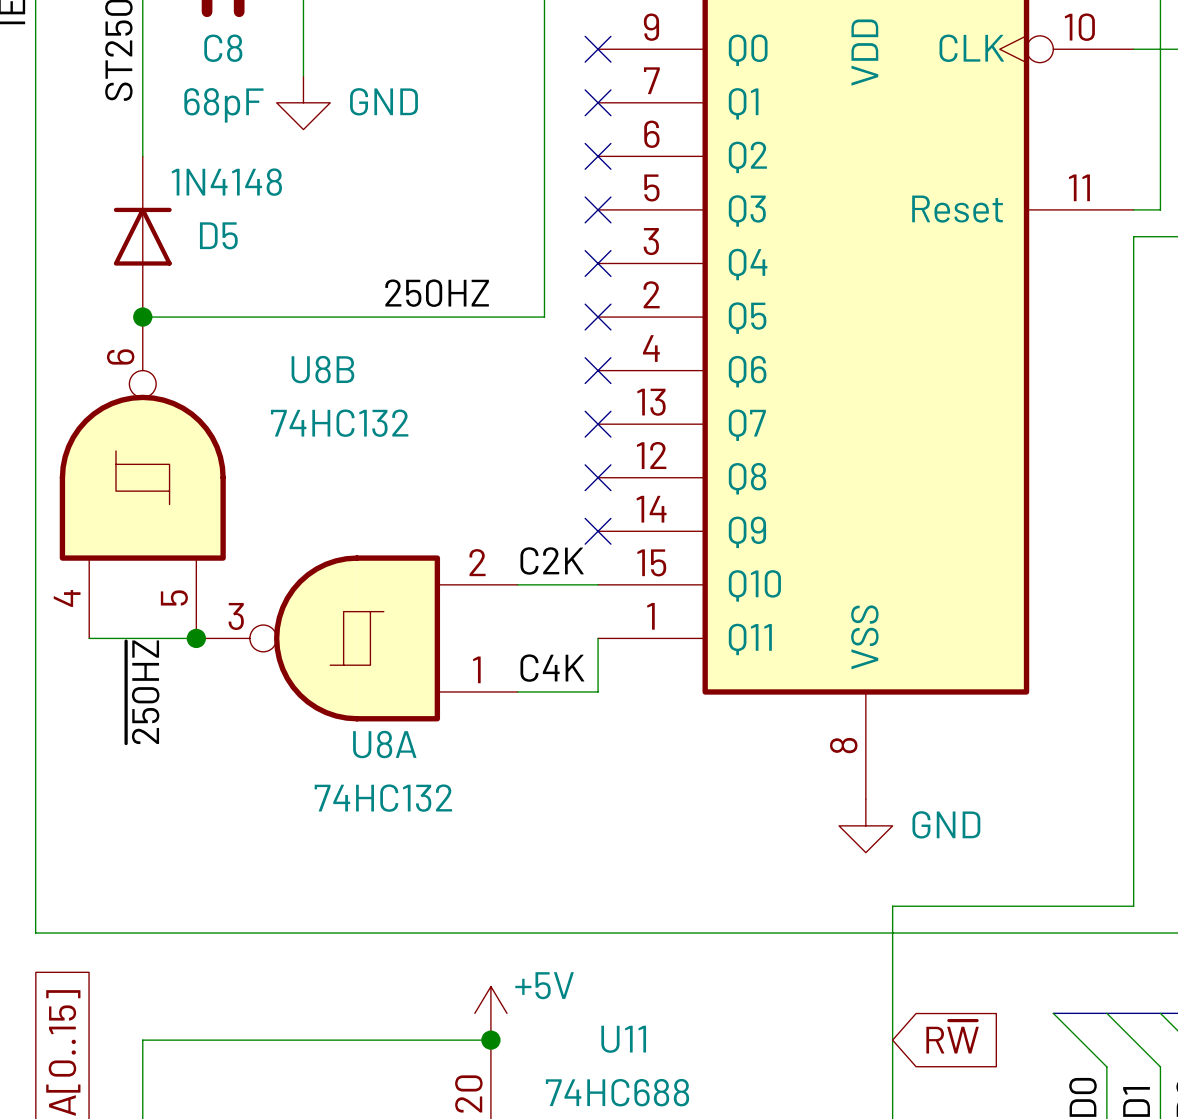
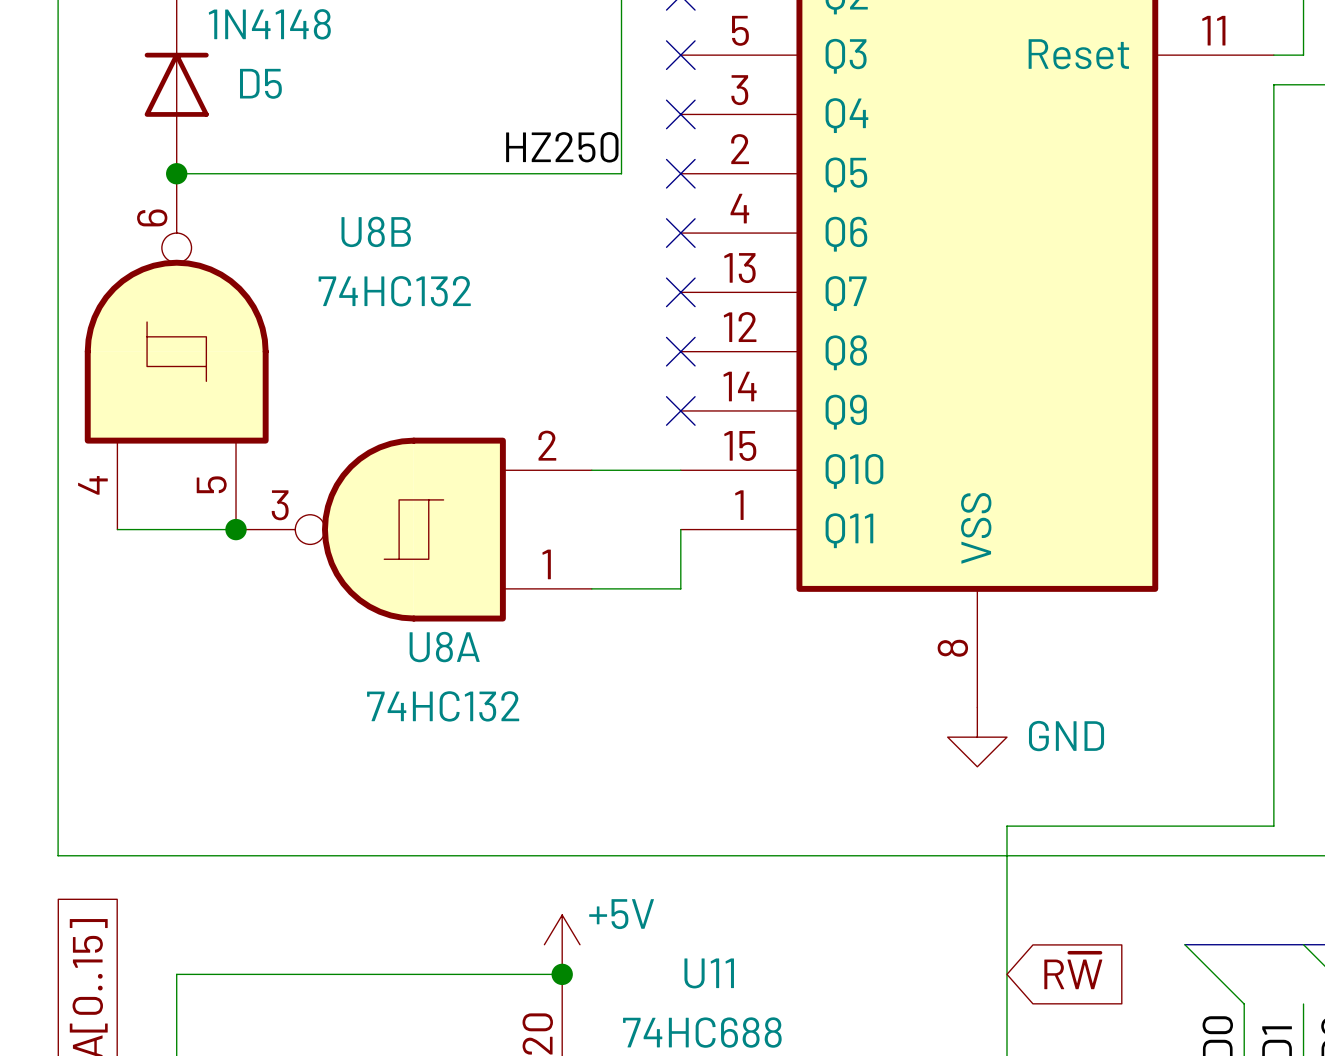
label: 250HZ (437, 293) -> none
label: none -> HZ250 (562, 147)
label: C2K (552, 560) -> none
label: C4K (552, 668) -> none
label: ~{250HZ} (142, 692) -> none
wire: (1106, 1013) (1160, 1066) -> none

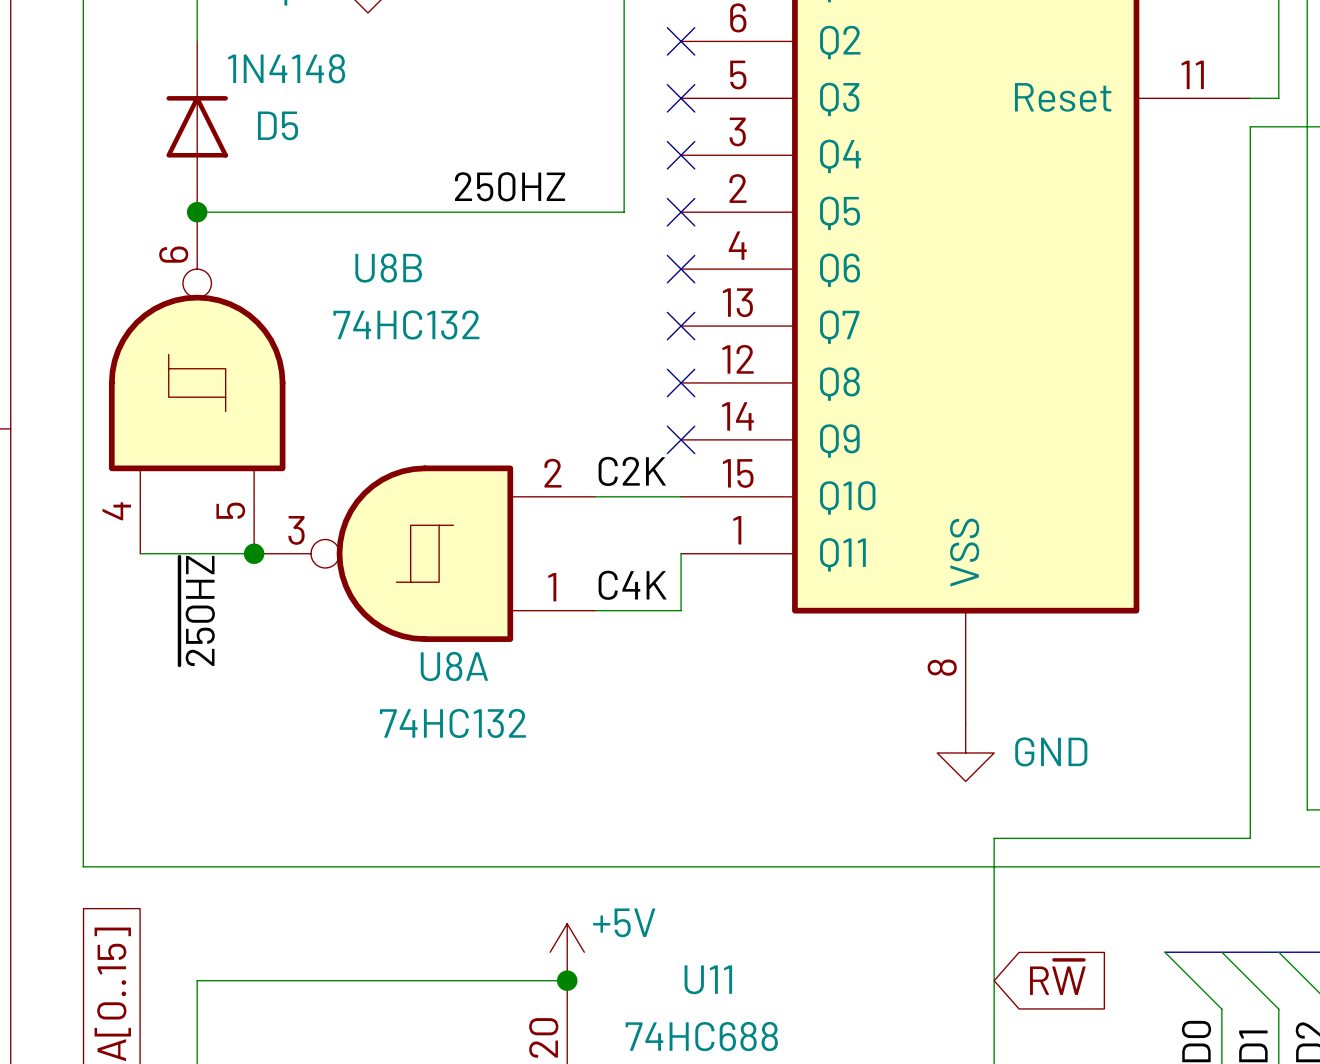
label: none -> 250HZ (510, 186)
label: HZ250 (562, 147) -> none
label: none -> C2K (632, 471)
label: none -> C4K (632, 585)
label: none -> ~{250HZ} (197, 610)
wire: none -> (1221, 952) (1278, 1009)

